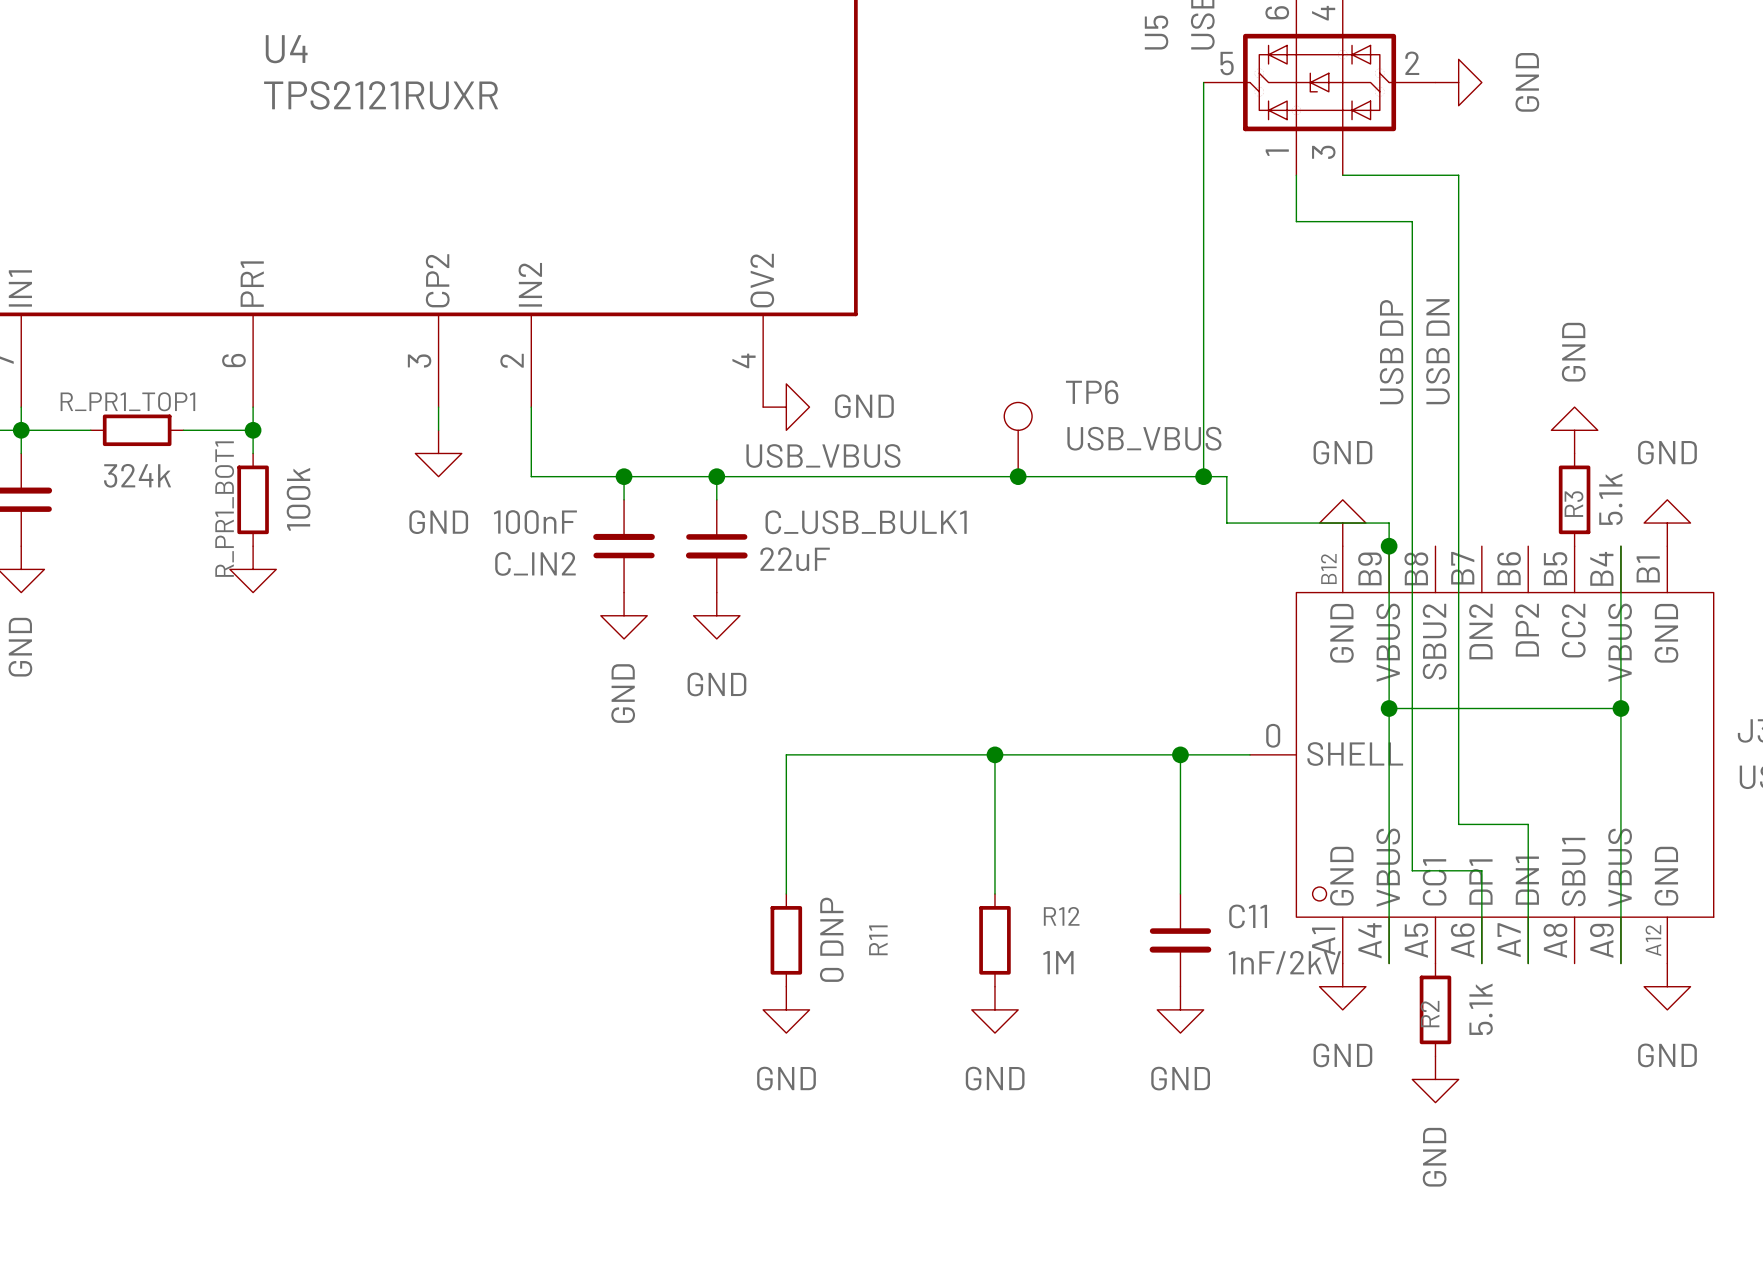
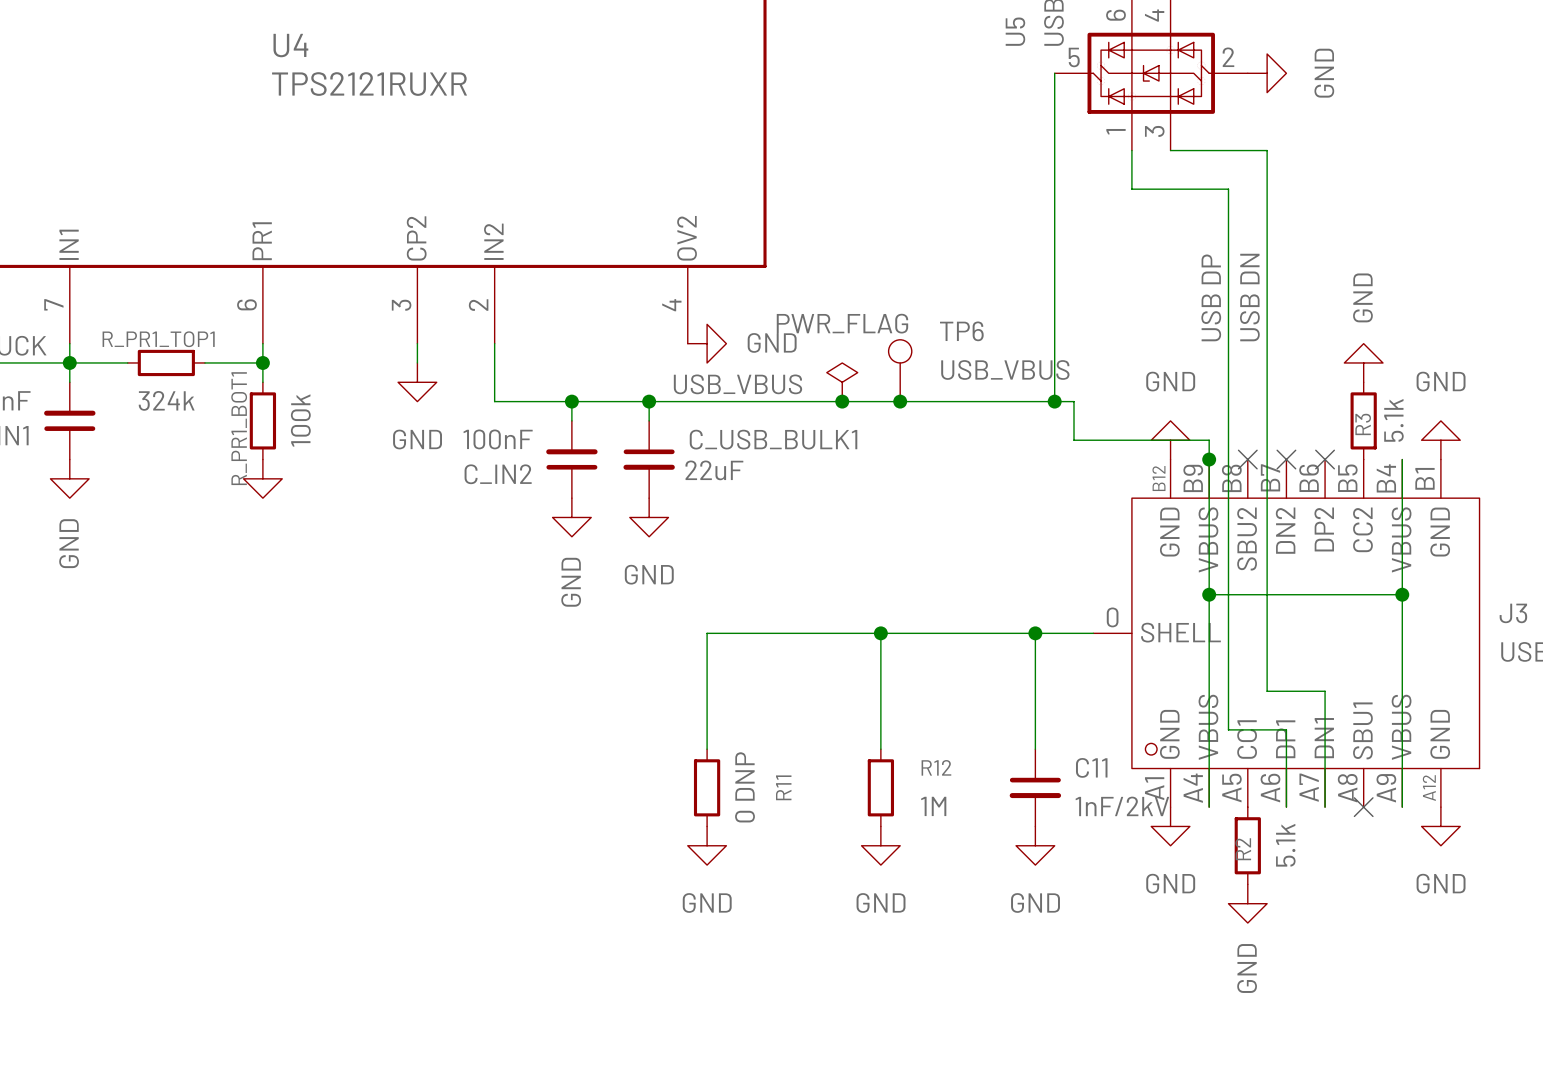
power symbol: none -> PWR_FLAG (842, 382)
junction: none -> (842, 401)
no-connect mark: none -> (1247, 459)
no-connect mark: none -> (1286, 459)
no-connect mark: none -> (1325, 459)
no-connect mark: none -> (1363, 807)

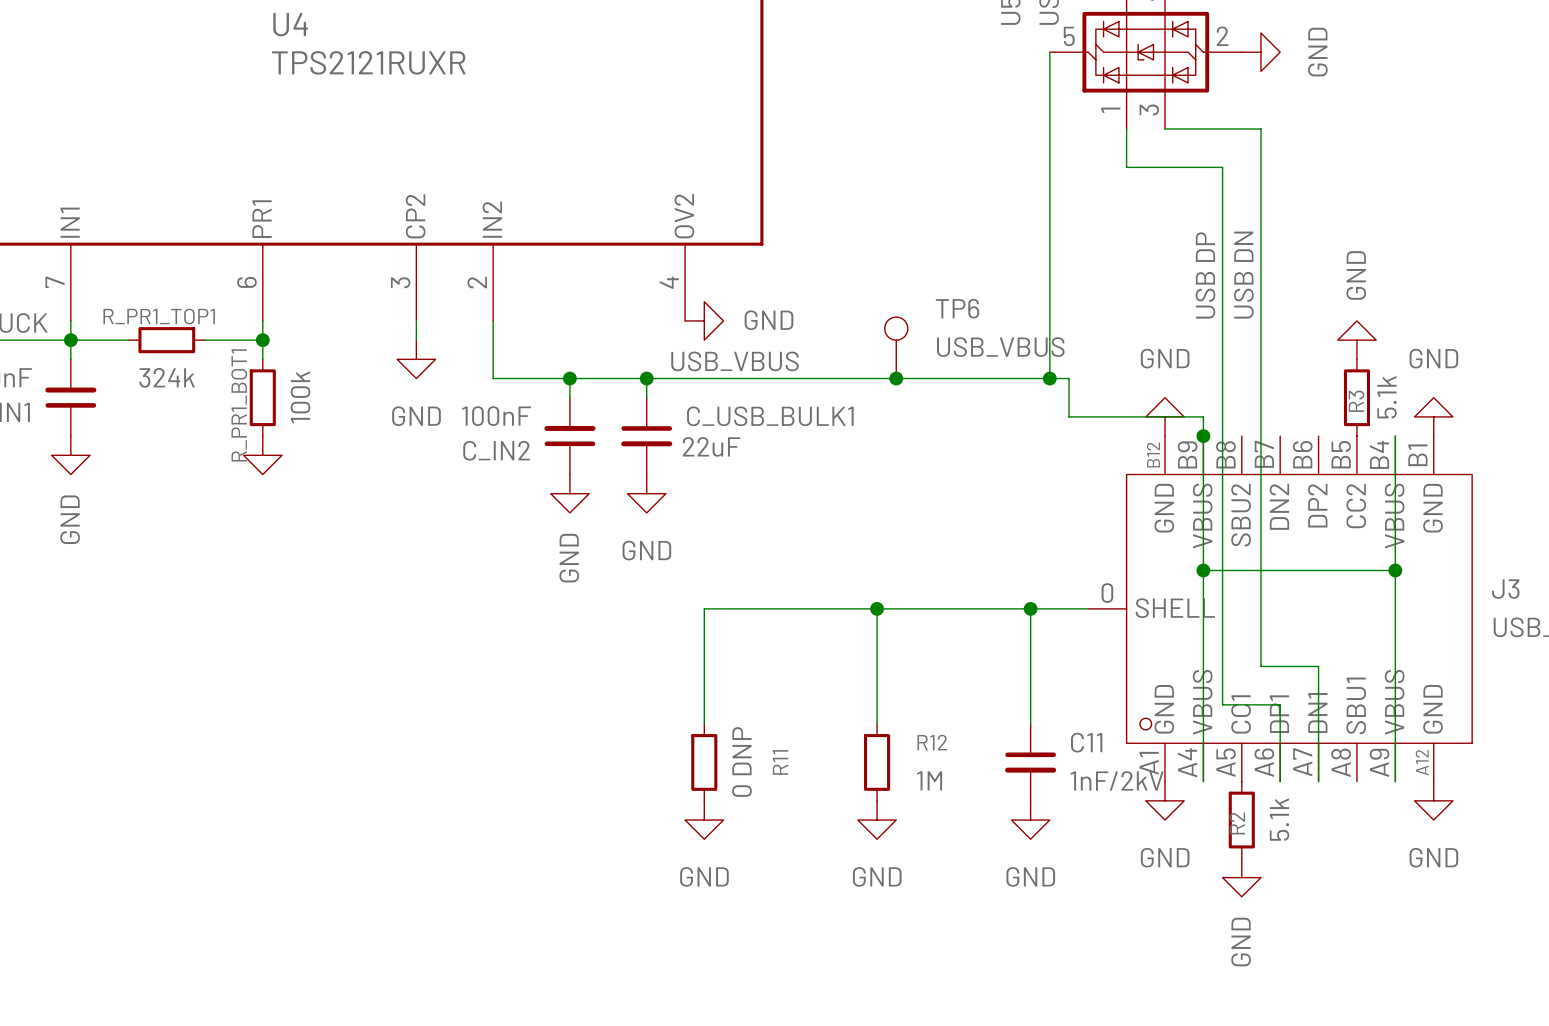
power symbol: PWR_FLAG (842, 382) -> none
junction: (842, 401) -> none
no-connect mark: (1247, 459) -> none
no-connect mark: (1286, 459) -> none
no-connect mark: (1325, 459) -> none
no-connect mark: (1363, 807) -> none

